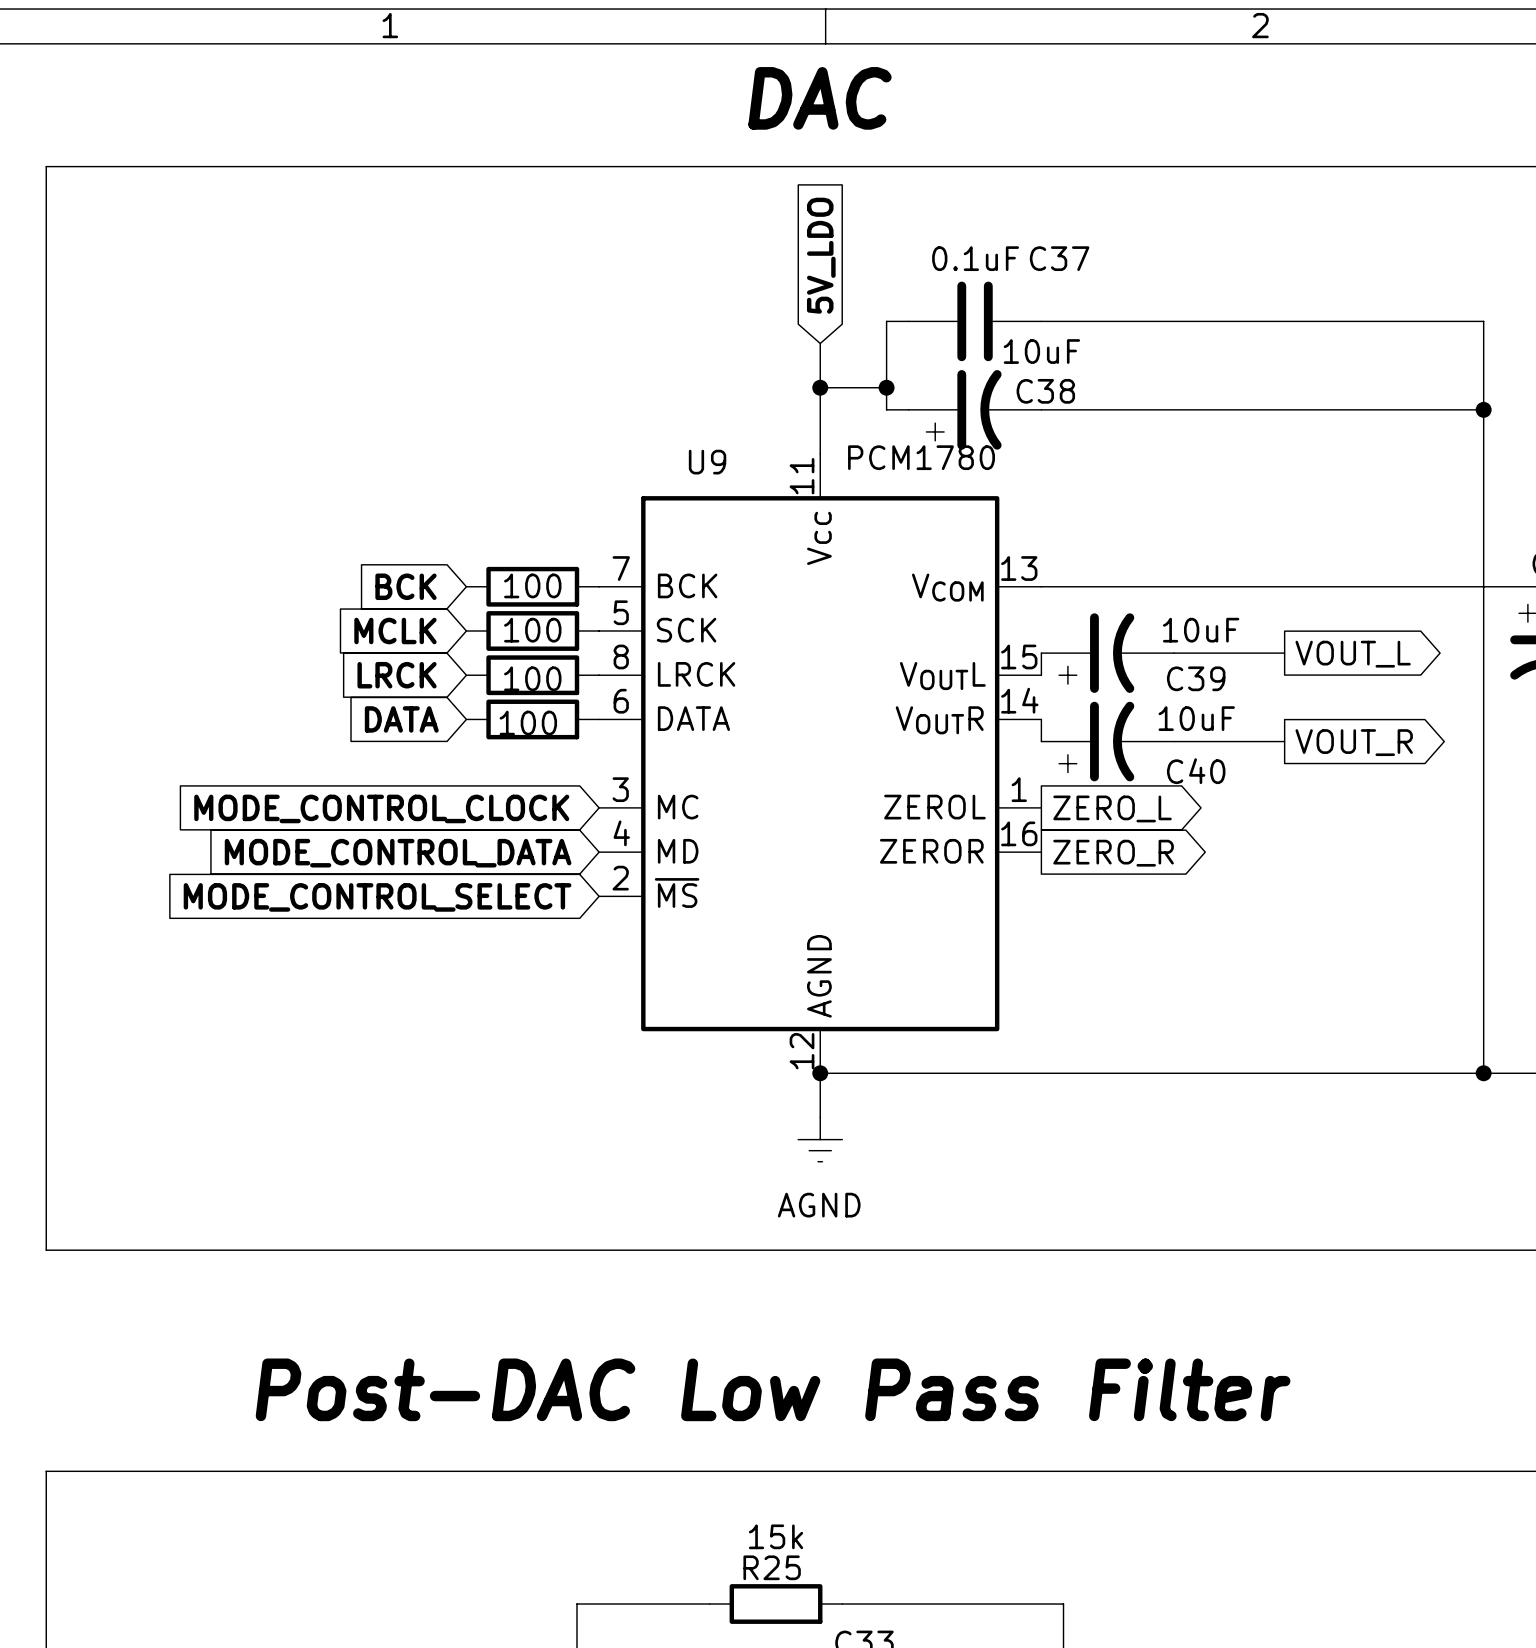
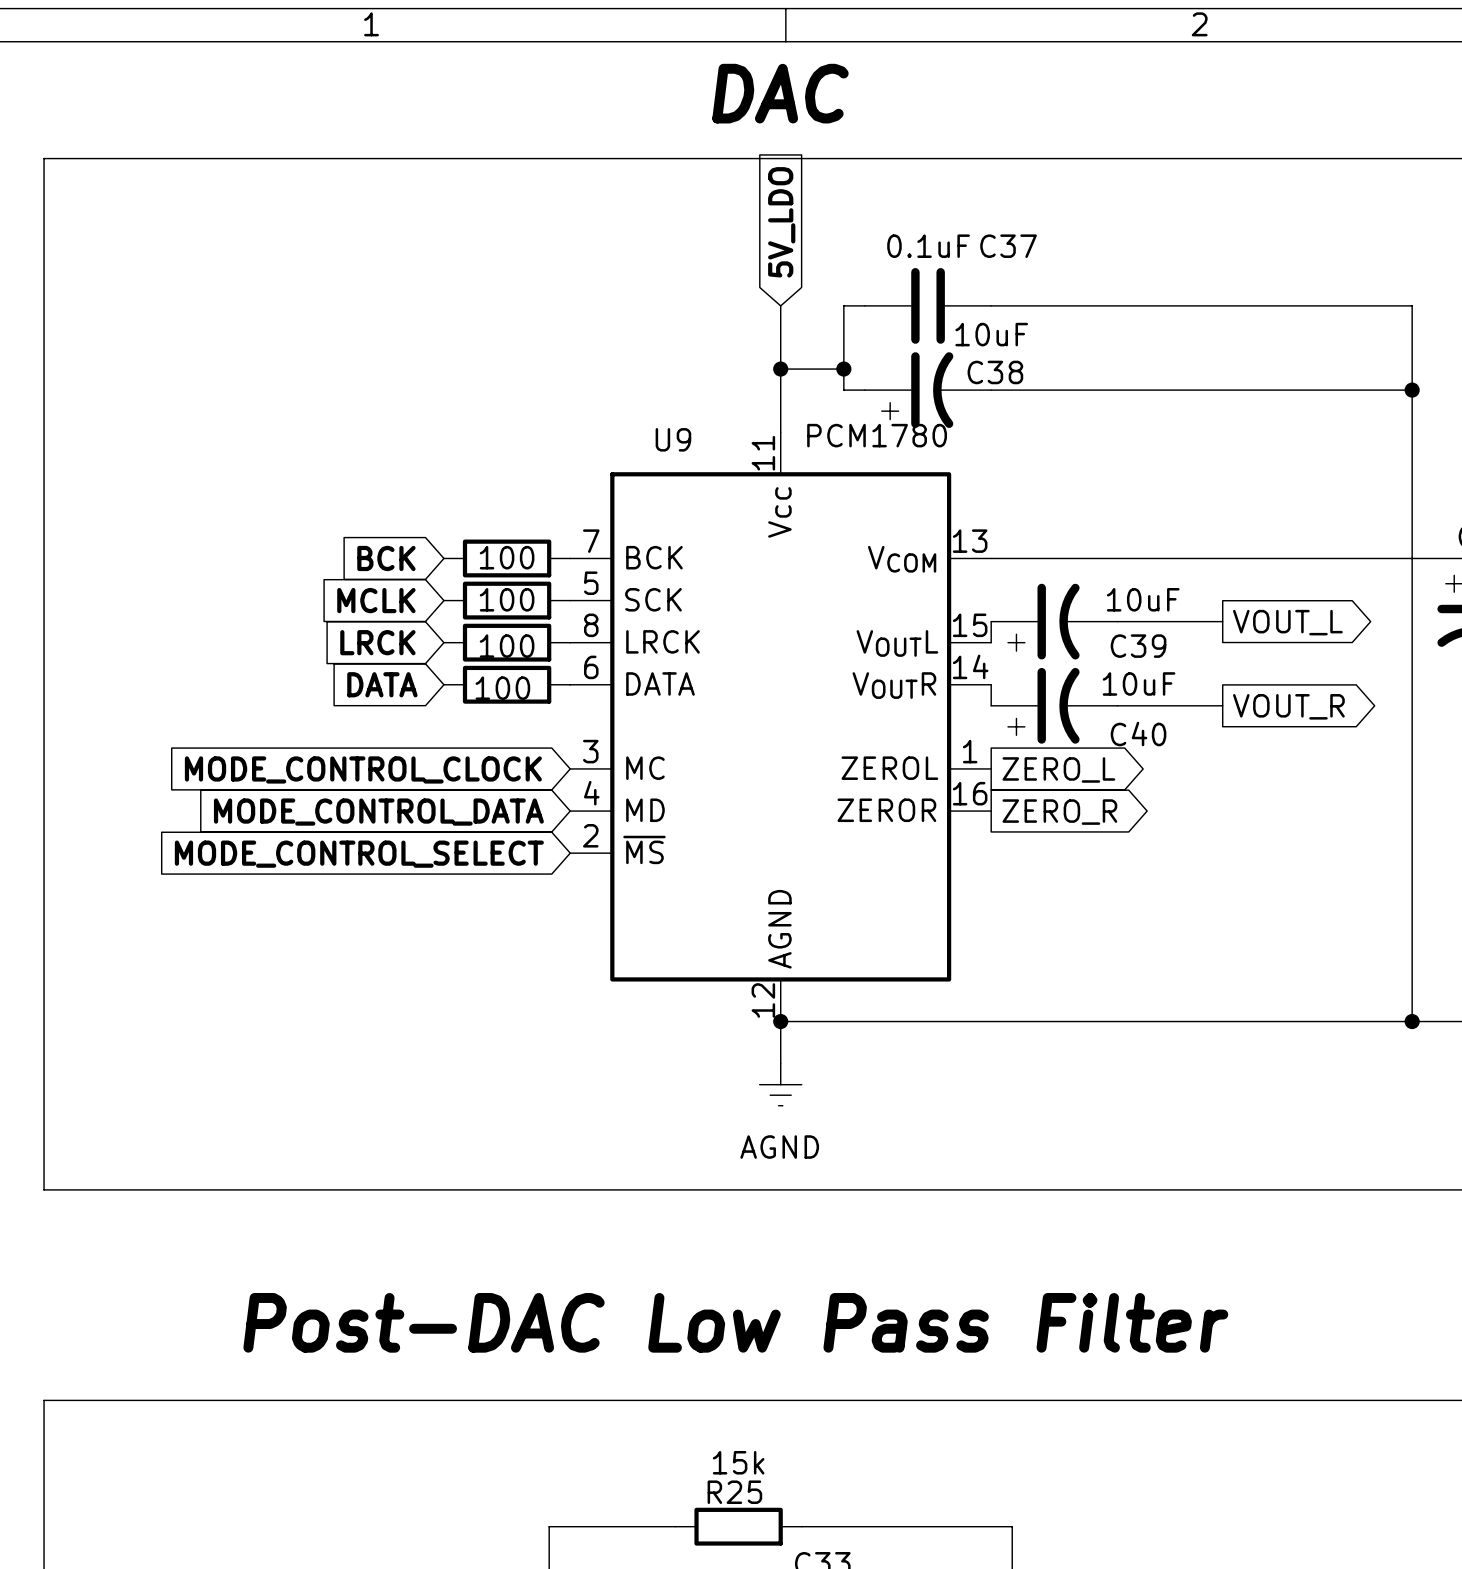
global label position: 5V_LDO (821, 255) -> 5V_LDO (781, 222)
wire: none -> (780, 305) (780, 326)

